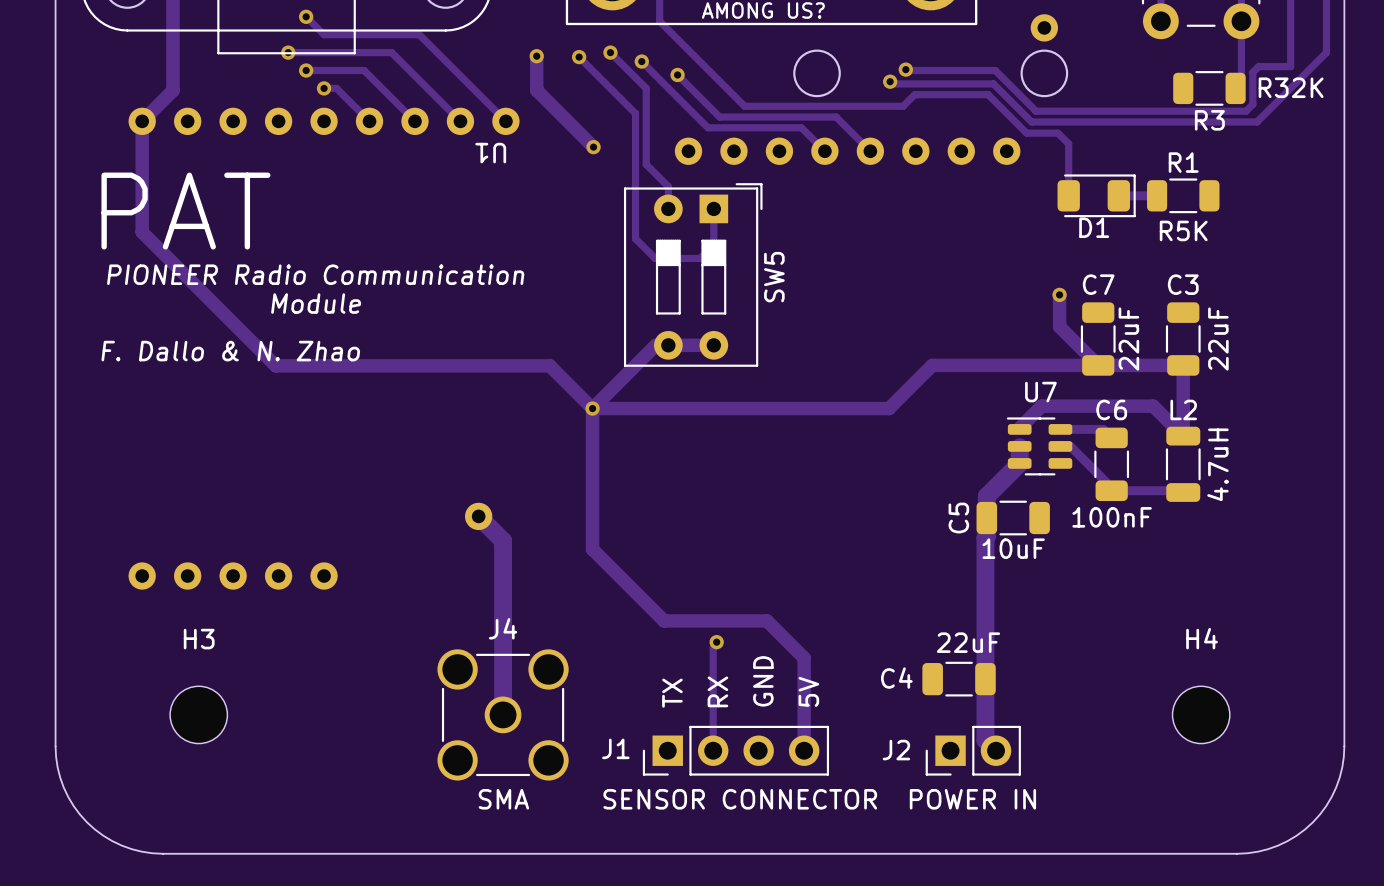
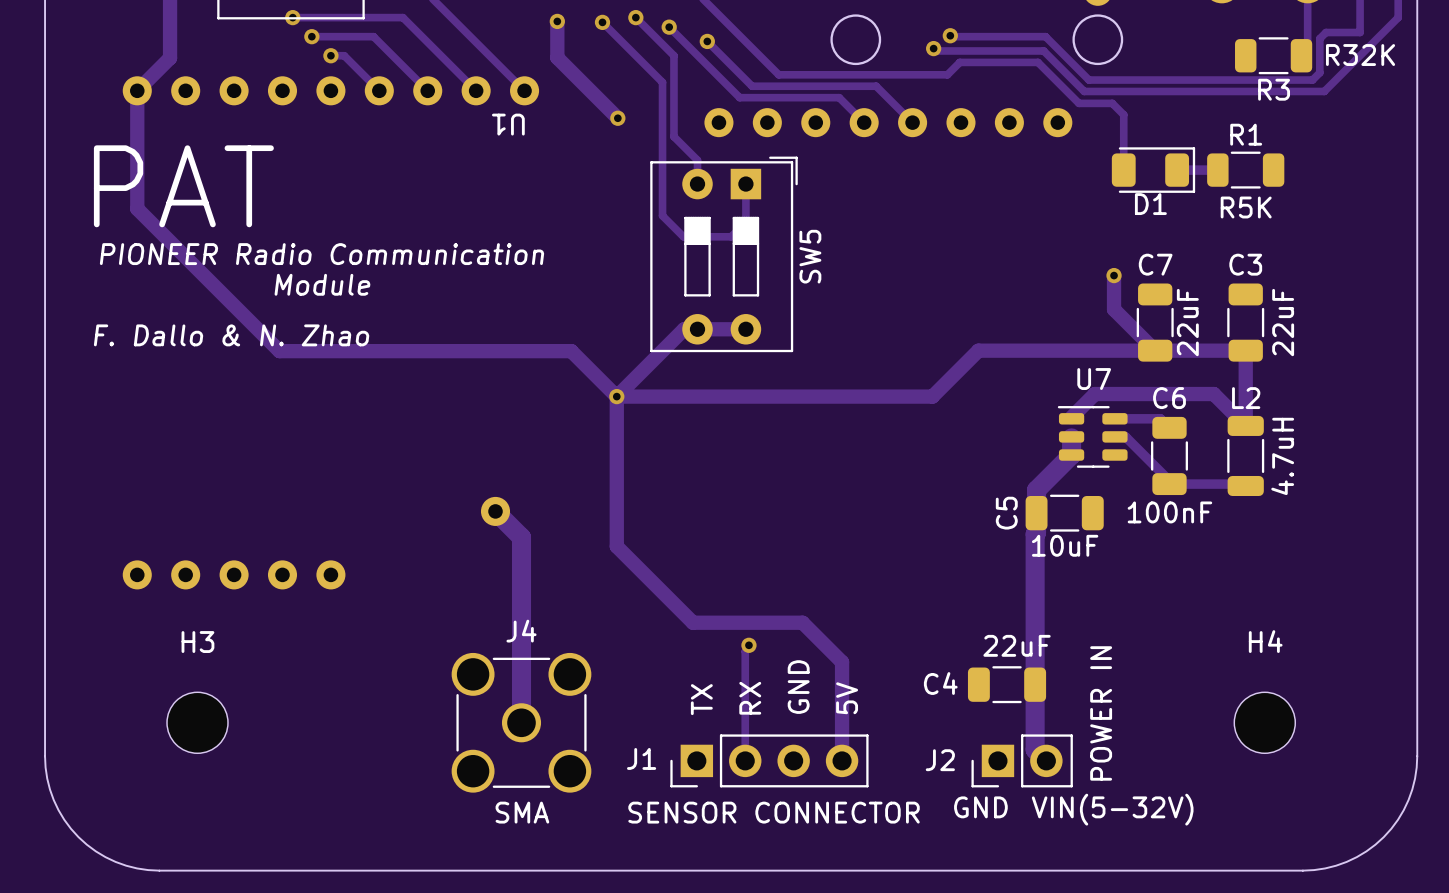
text: none -> GND (980, 807)
text: none -> VIN(5-32V) (1112, 809)
text rotation: 0° (972, 799) -> 90° counterclockwise (1101, 713)

